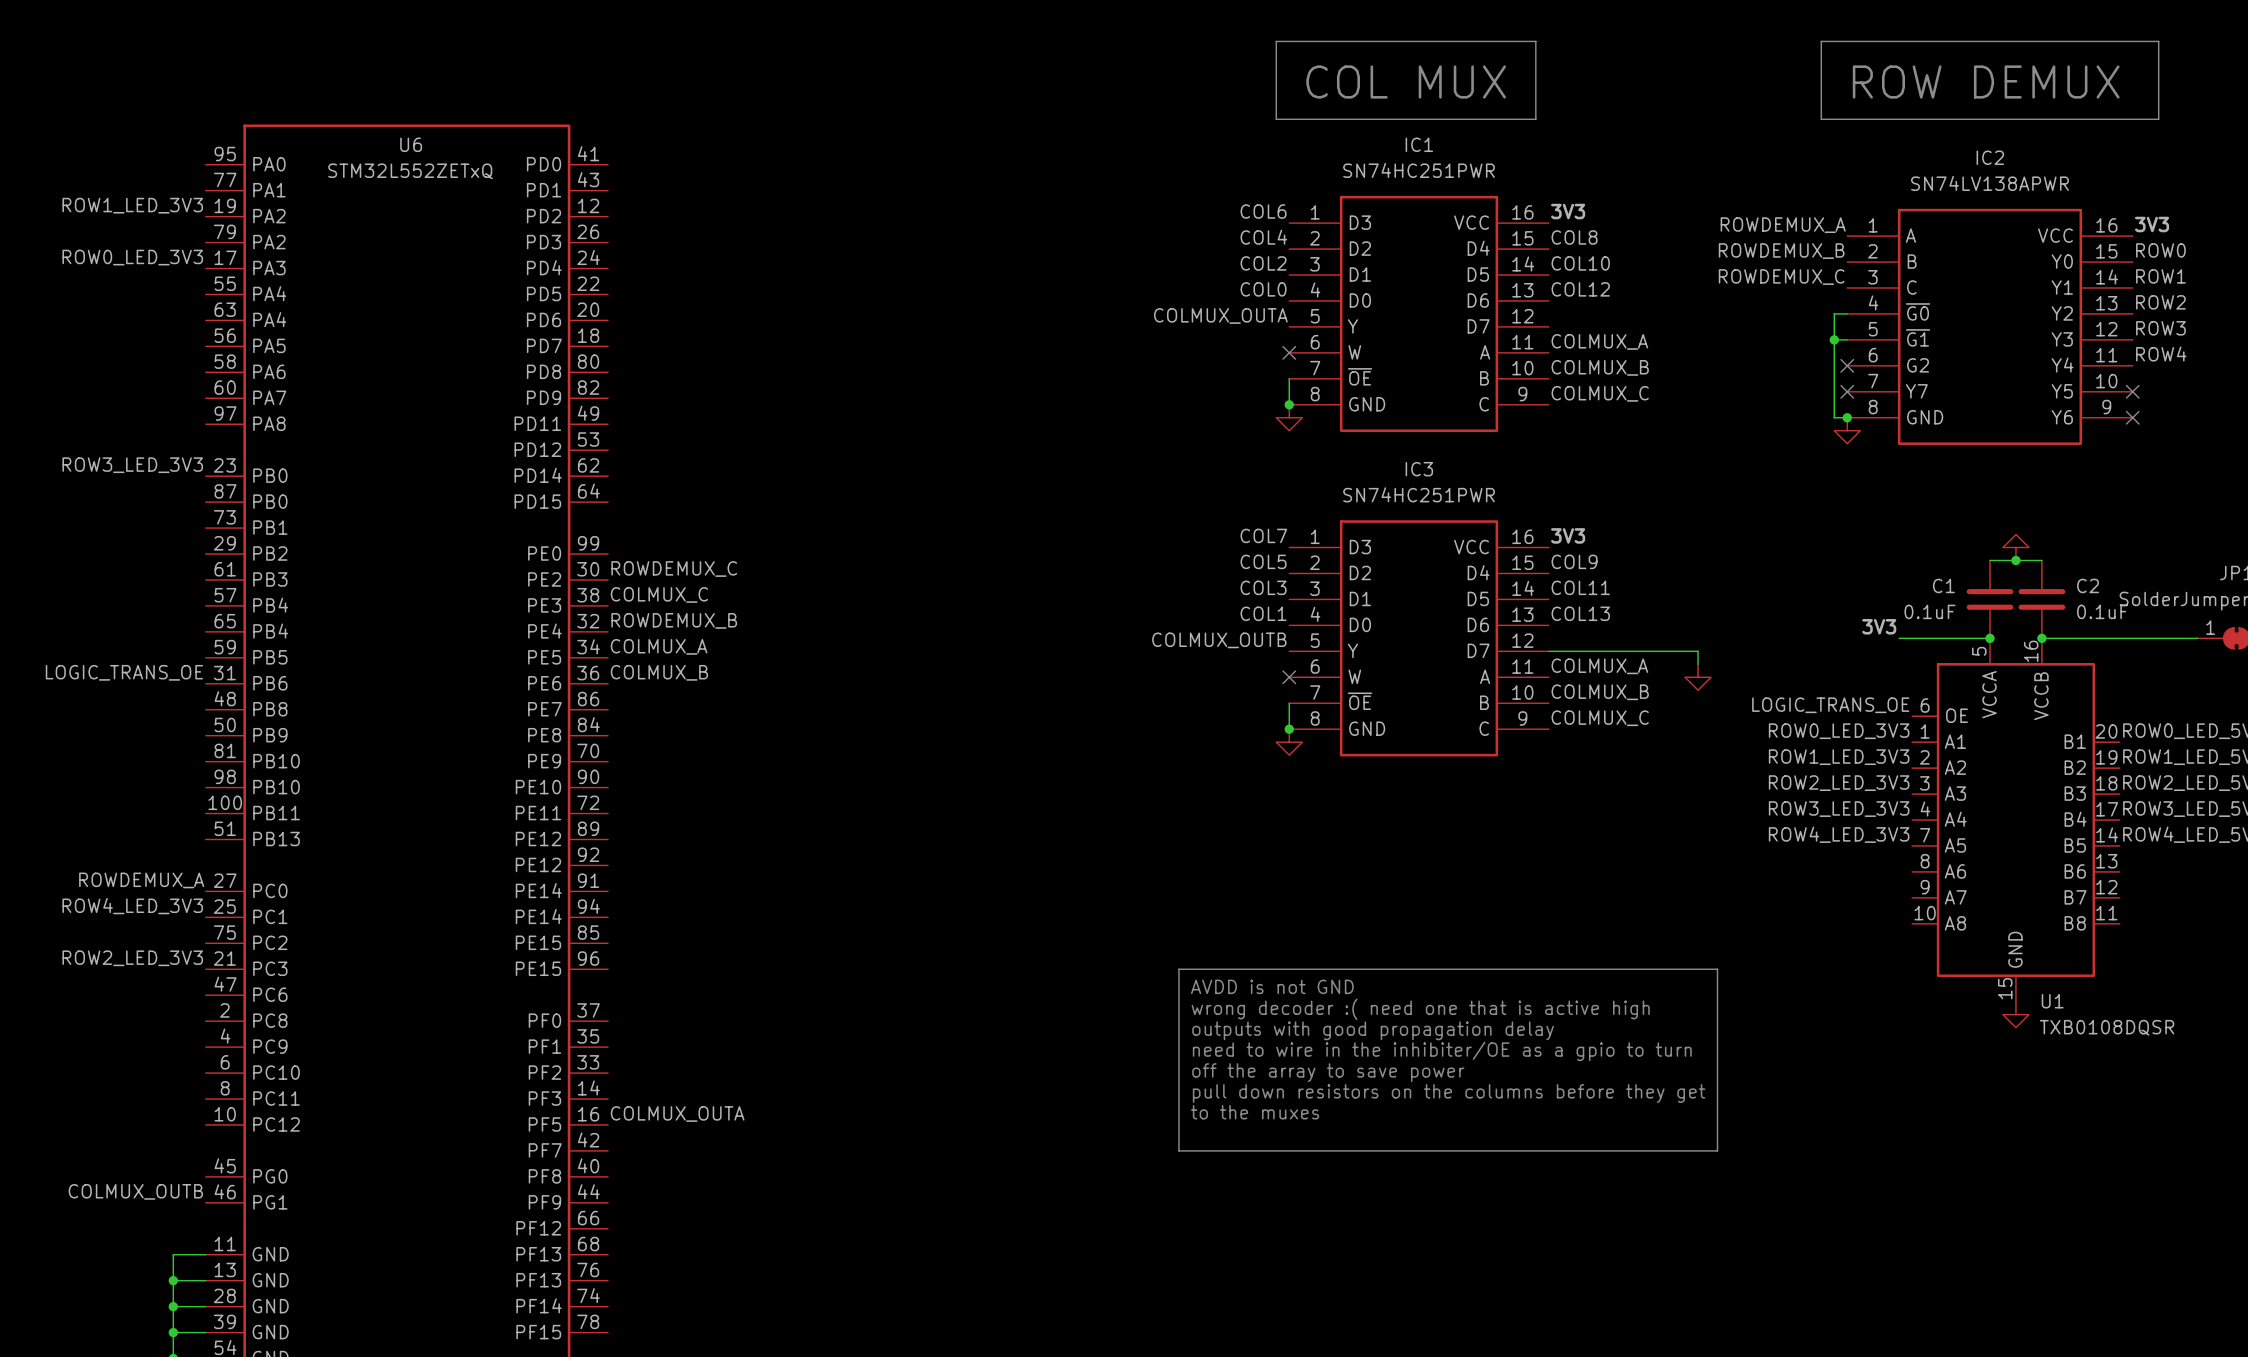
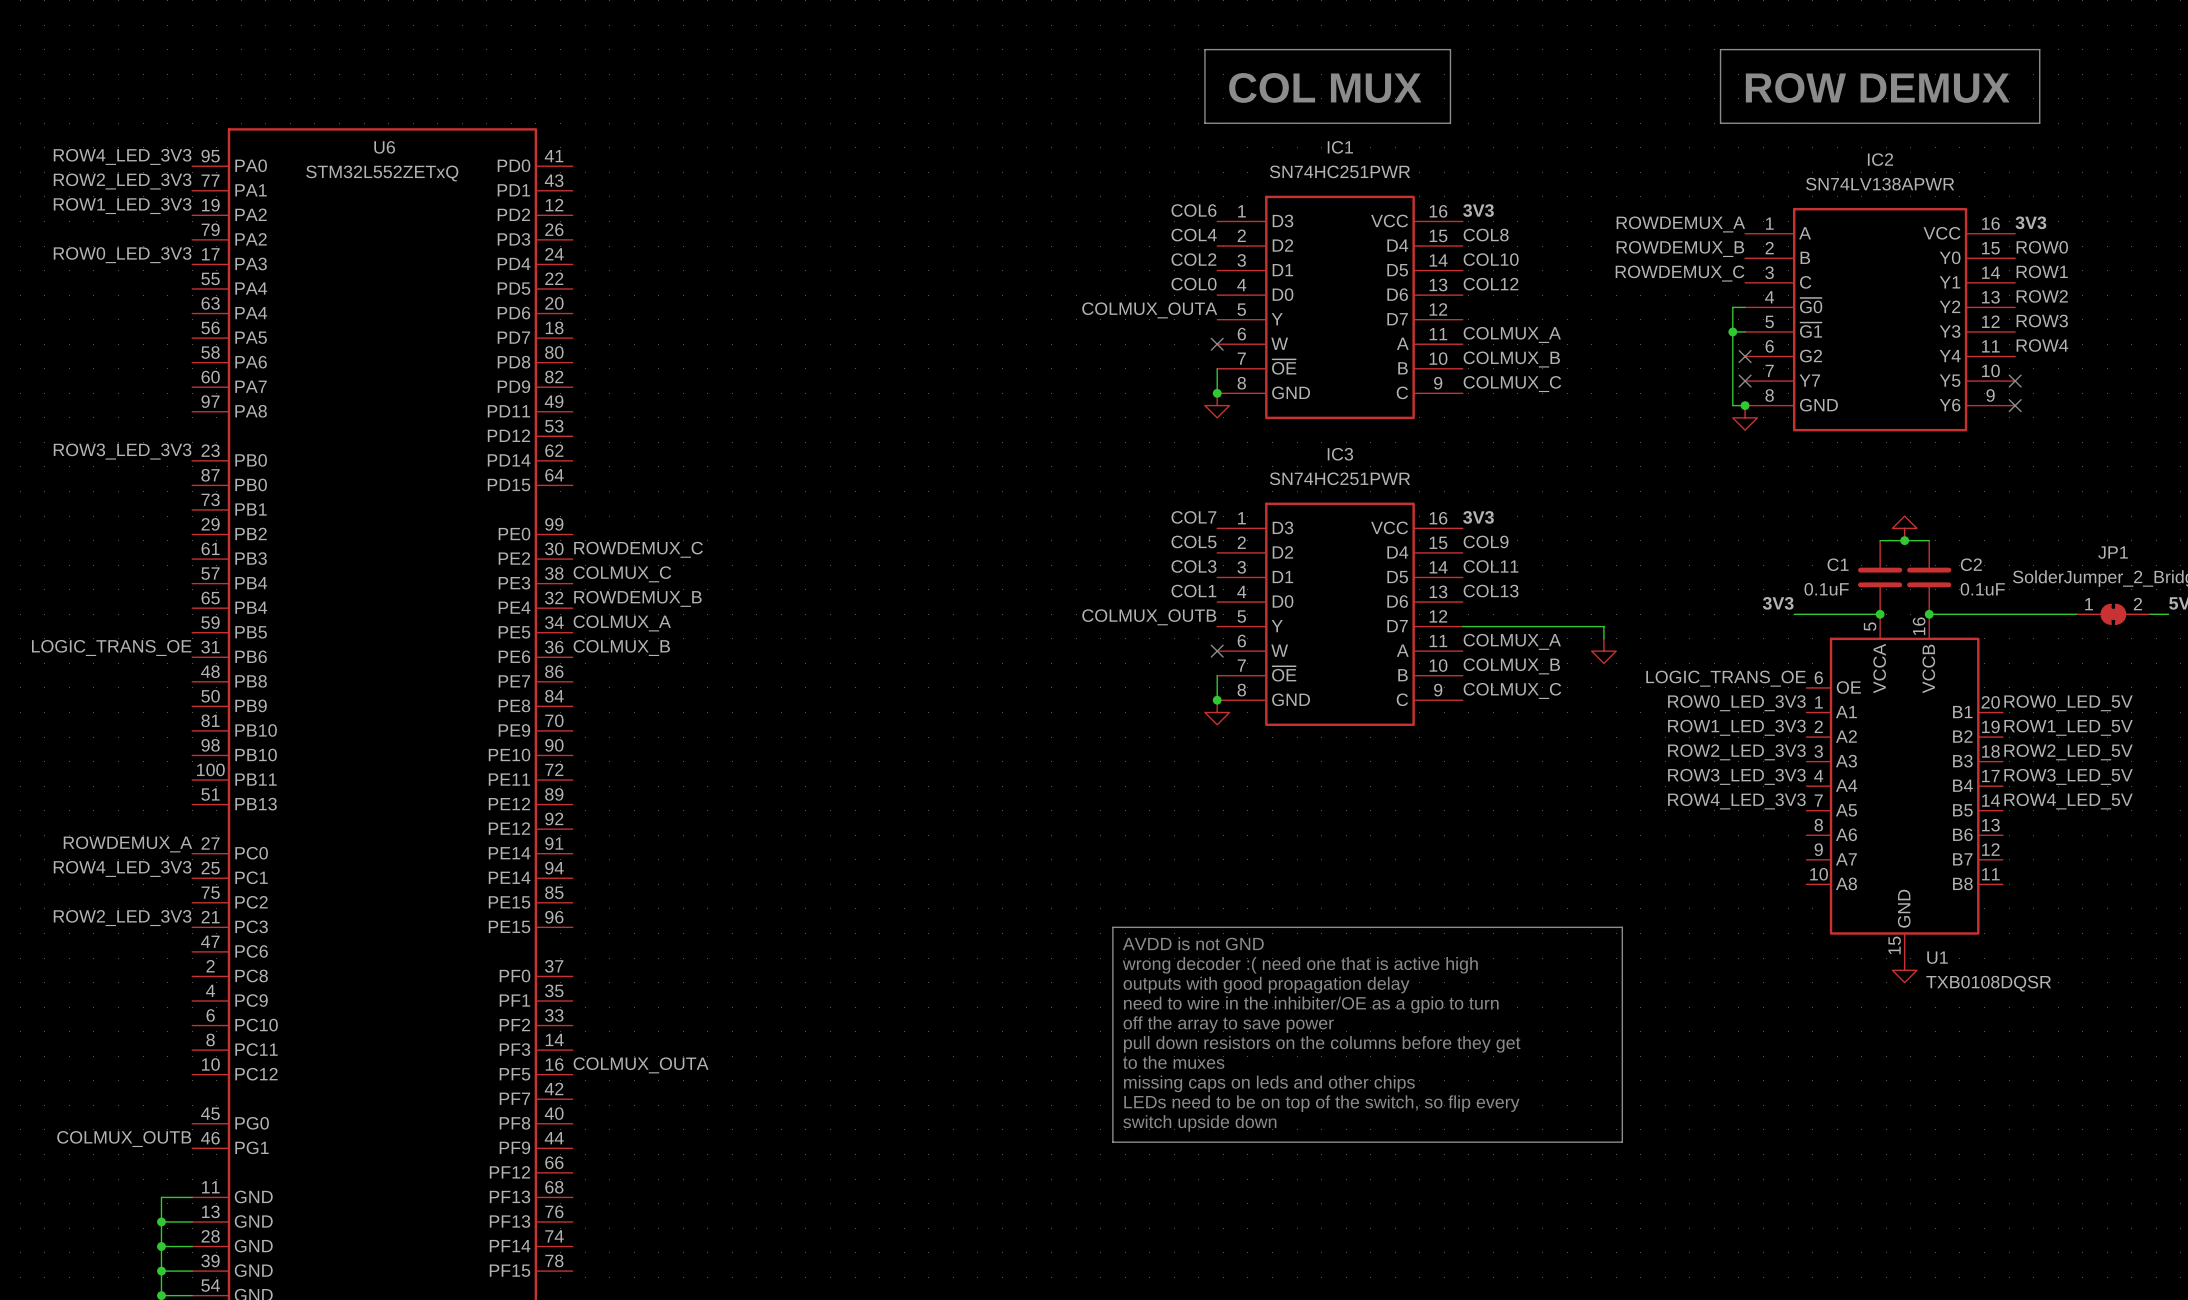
label: none -> ROW4_LED_3V3 (122, 156)
label: none -> ROW2_LED_3V3 (122, 181)
text: none -> missing caps on leds and other chips (1269, 1083)
line: (1178, 1150) (1717, 1150) -> (1112, 1099) (1112, 1142) (1622, 1142) (1622, 1099)
text: none -> LEDs need to be on top of the switch, so flip every (1321, 1103)
text: none -> switch upside down (1199, 1123)

